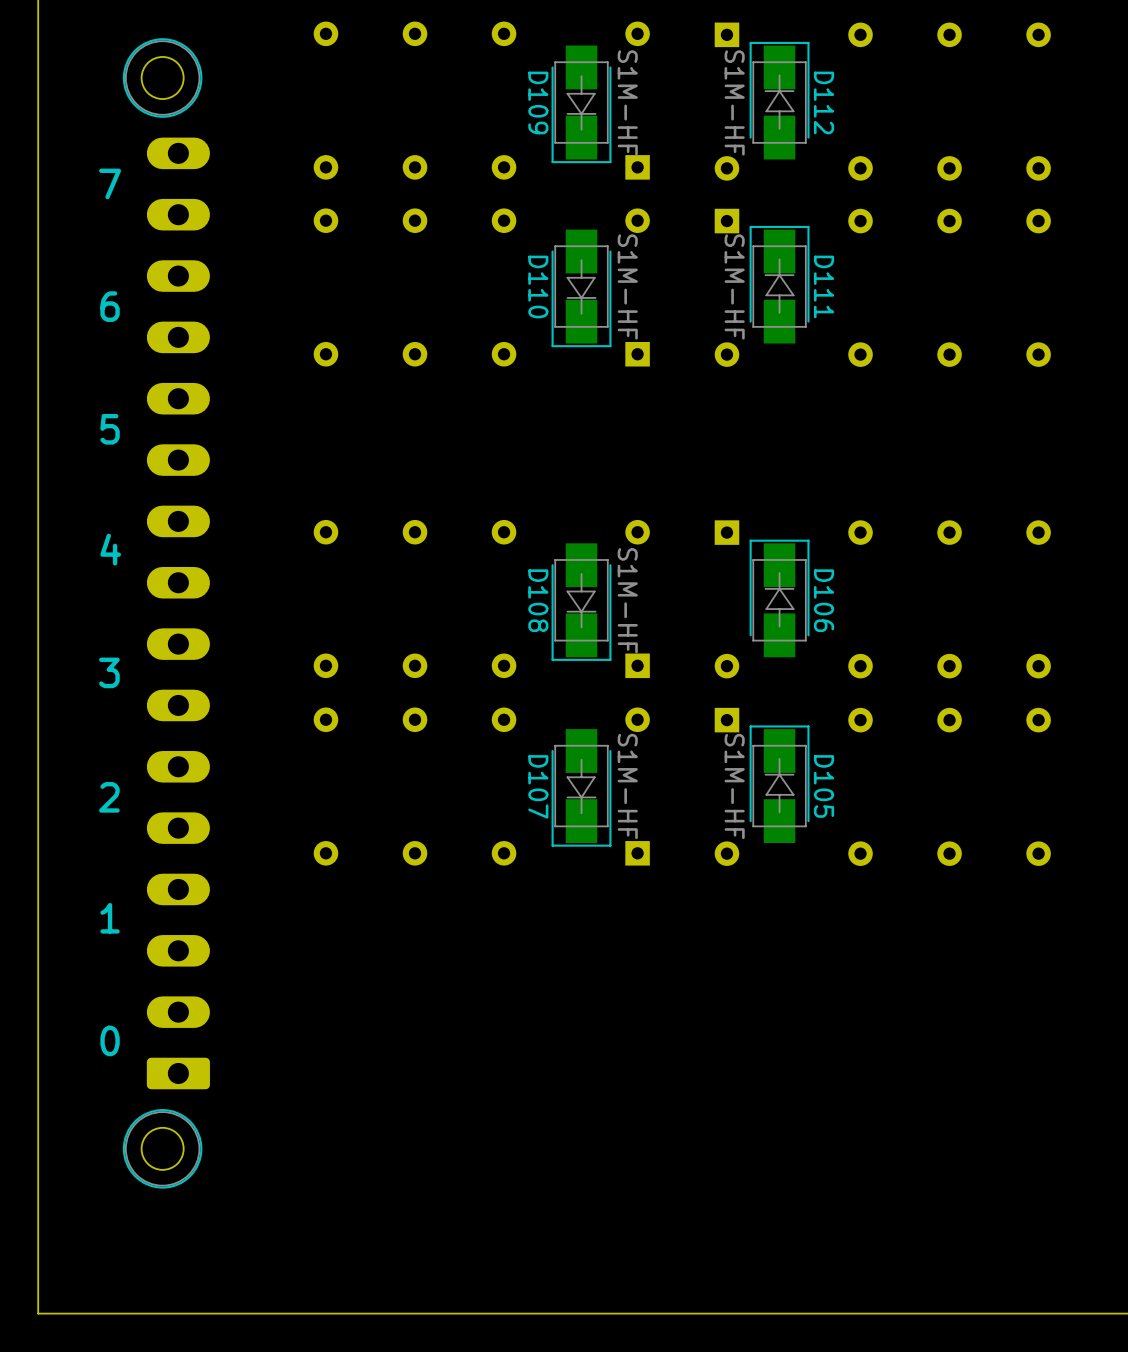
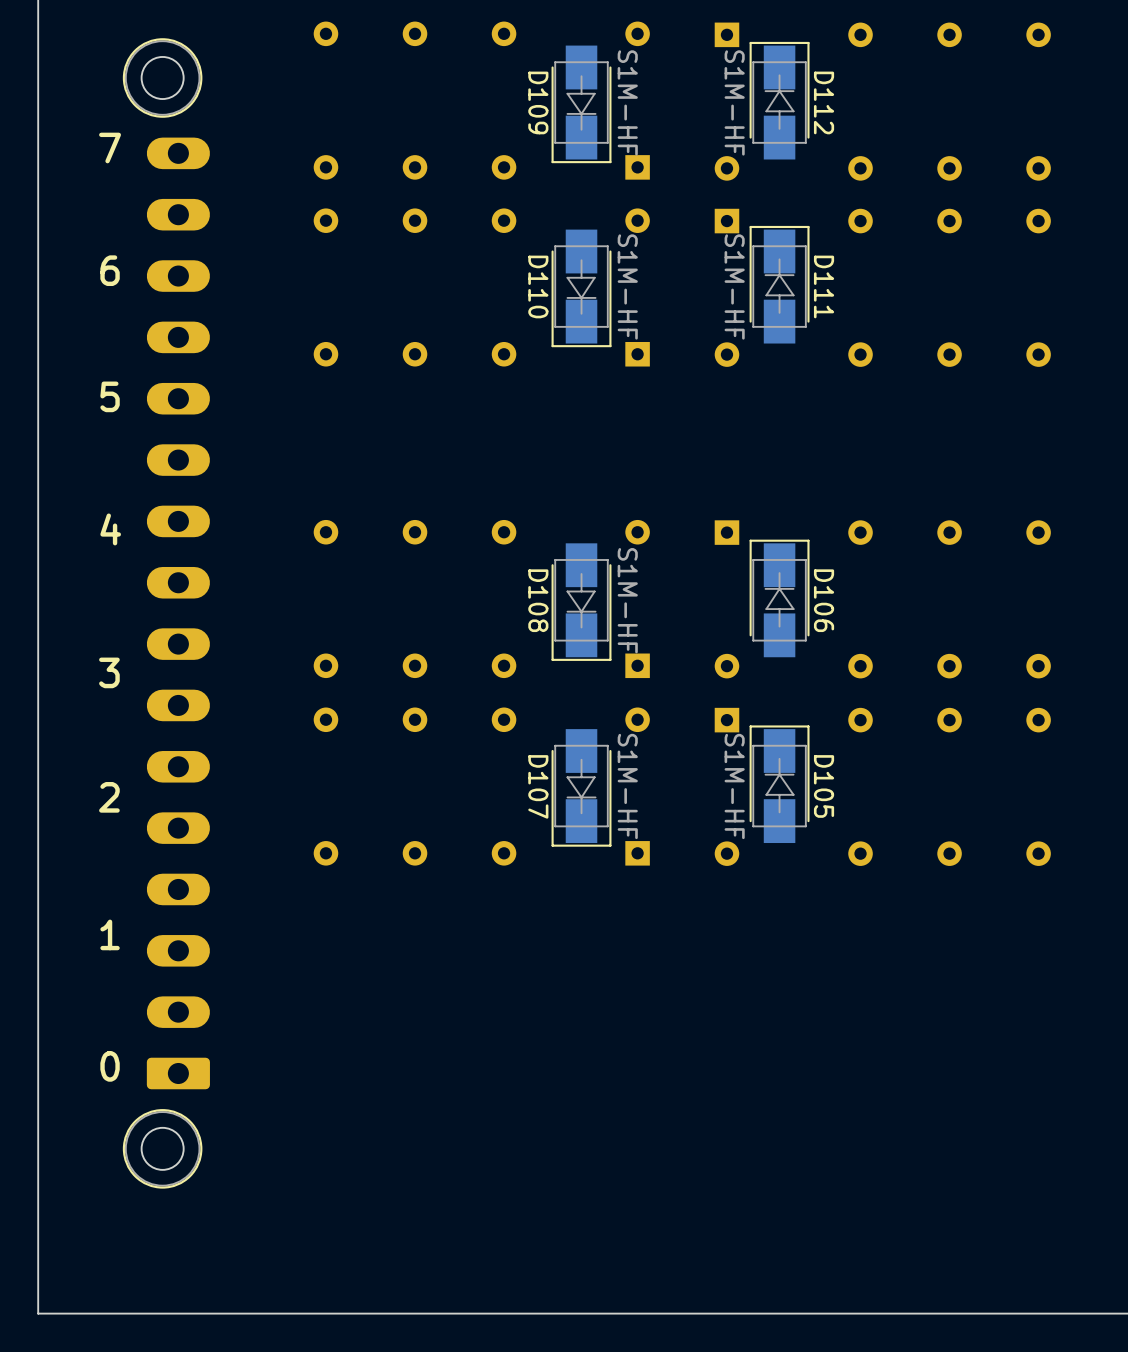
text position: 7 (110, 183) -> 7 (110, 147)
text position: 6 (110, 306) -> 6 (110, 270)
text position: 5 (110, 429) -> 5 (110, 396)
text position: 4 (110, 549) -> 4 (110, 529)
text position: 1 (110, 918) -> 1 (110, 934)
text position: 0 (110, 1040) -> 0 (110, 1066)

